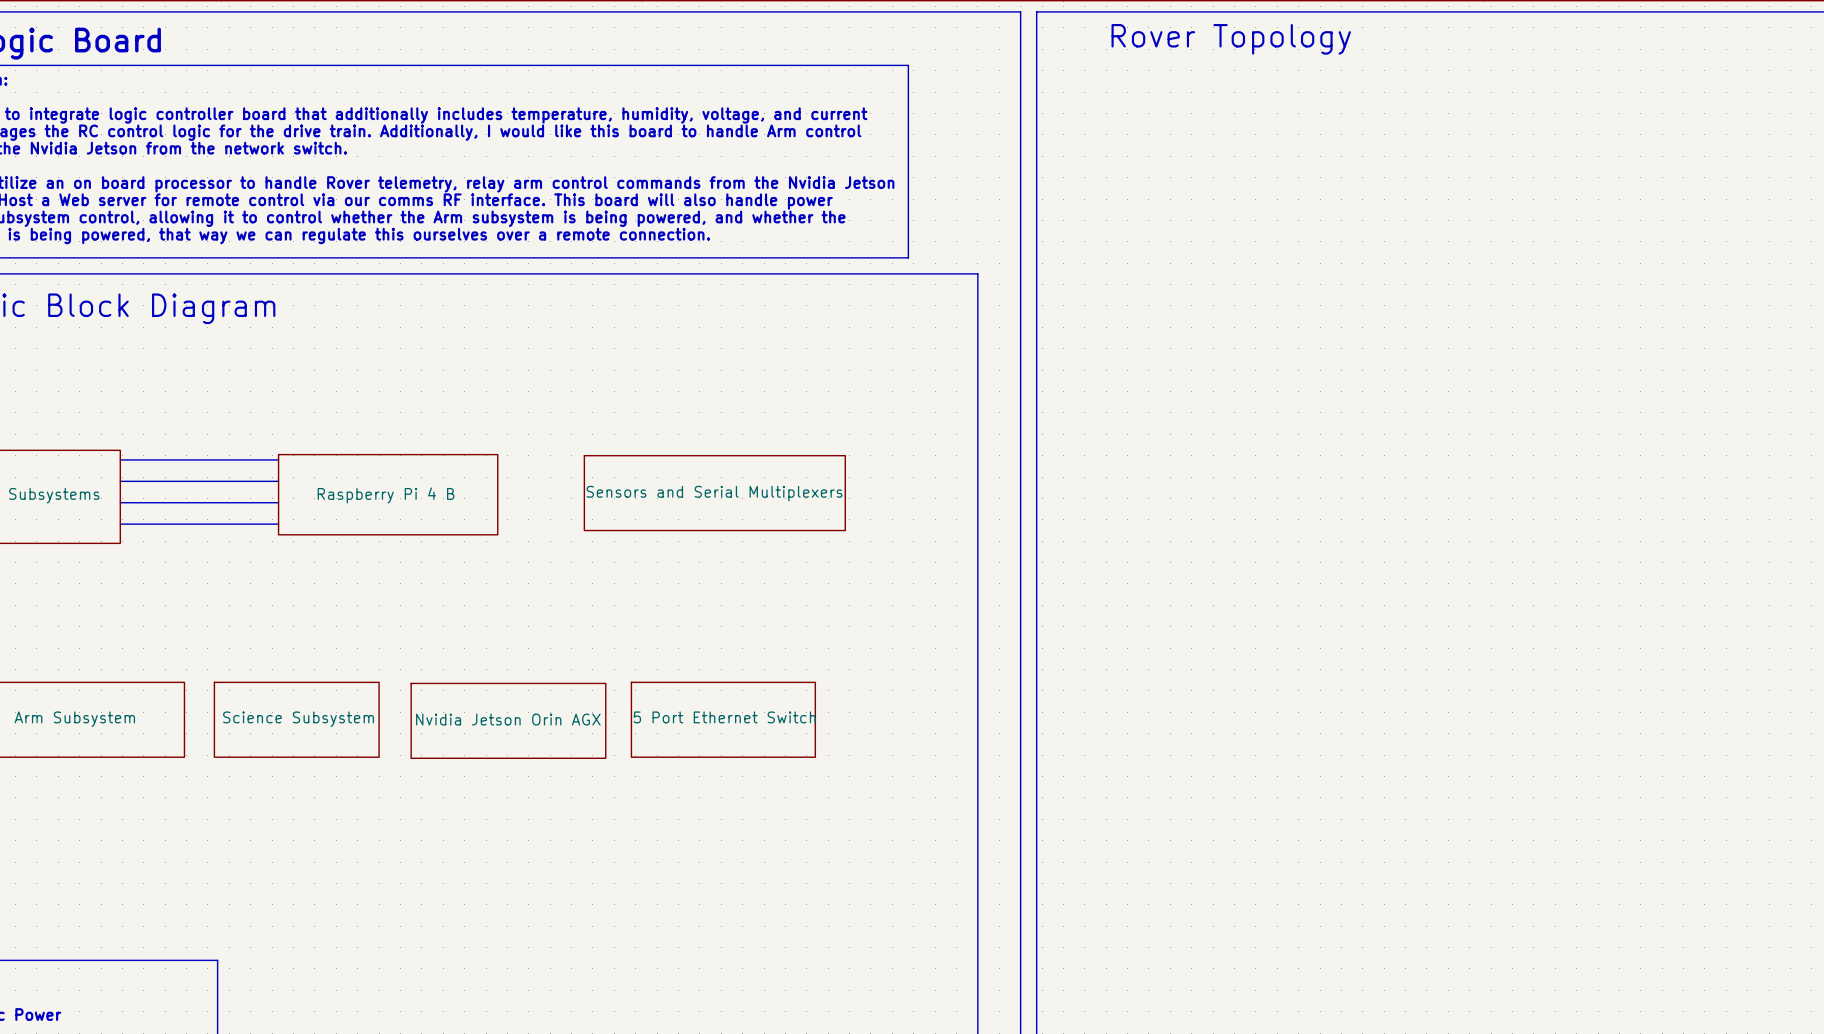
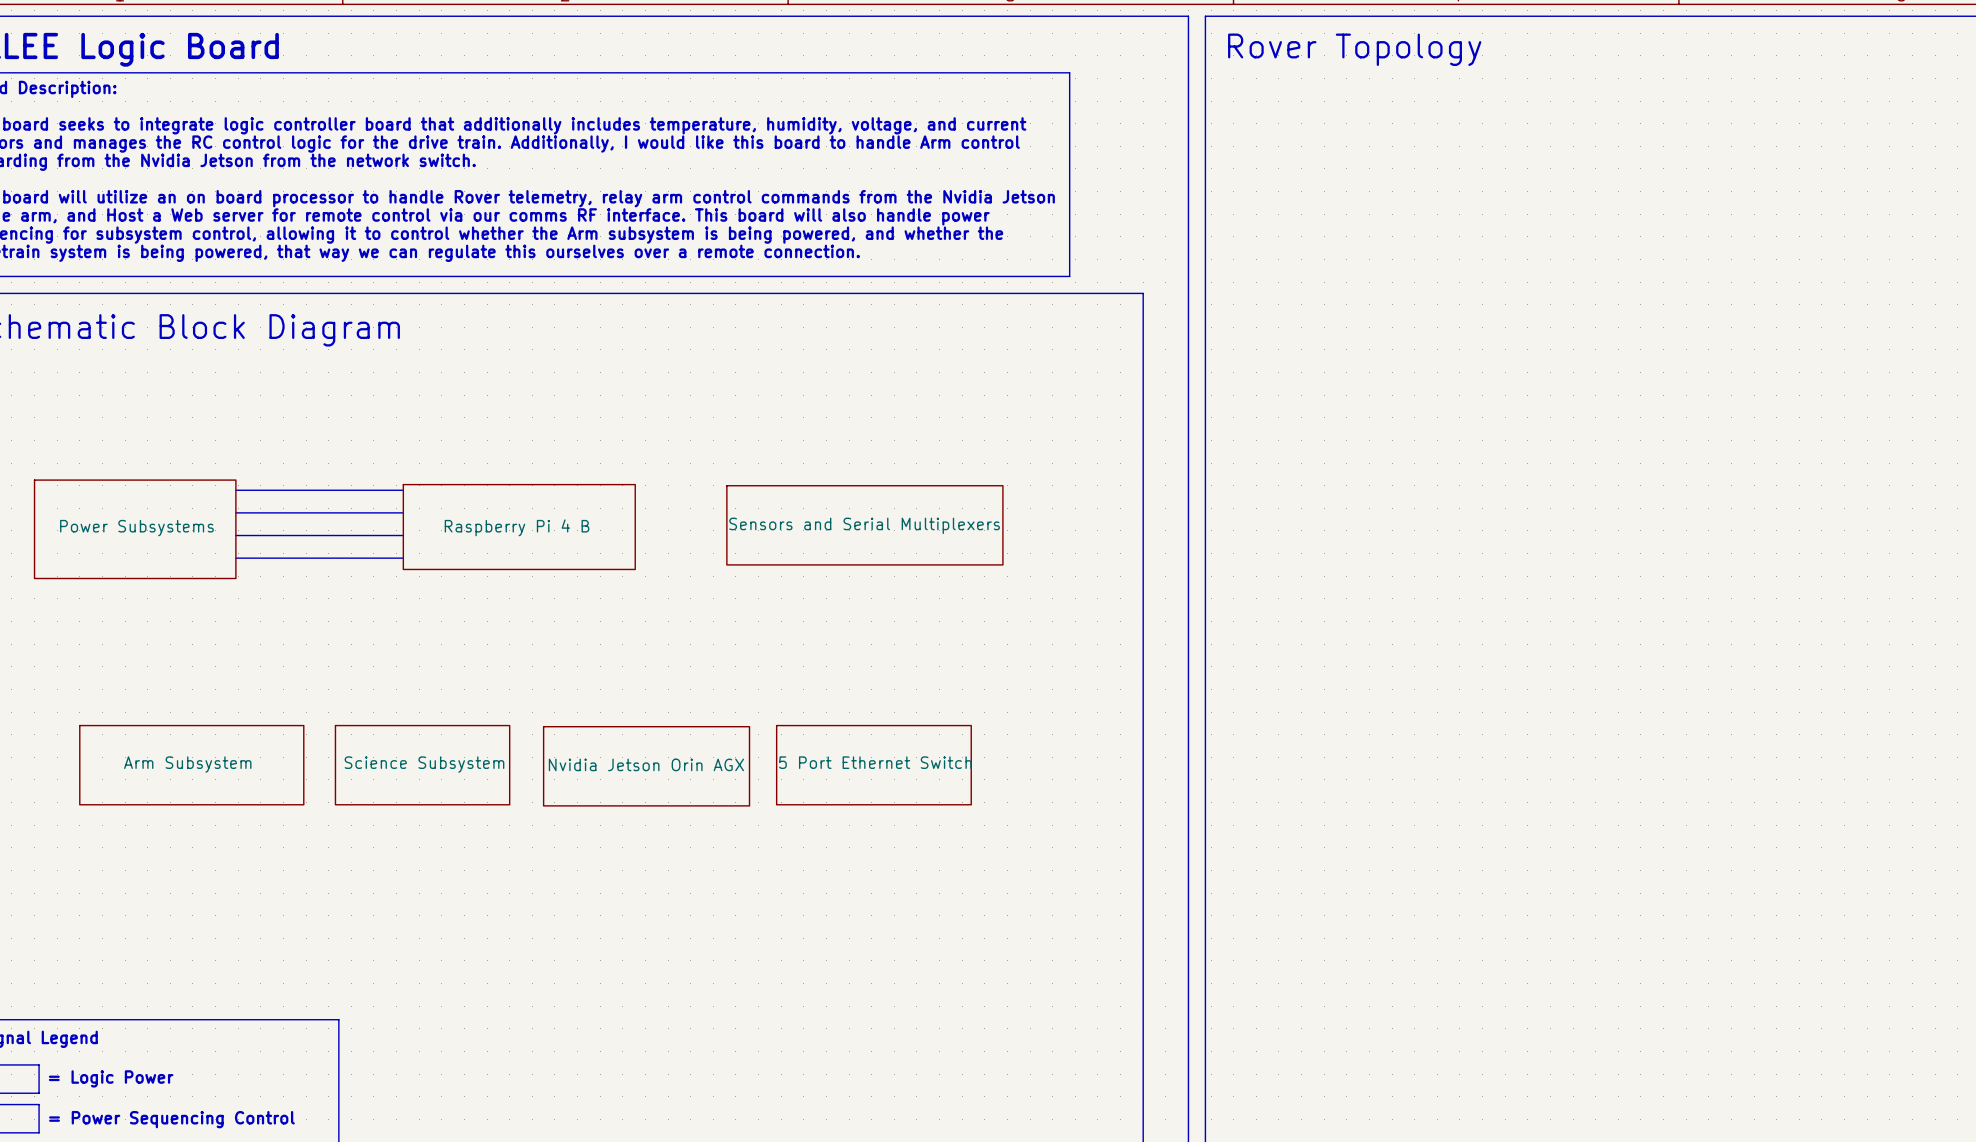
text position: Rover Topology (1231, 39) -> Rover Topology (1354, 49)

